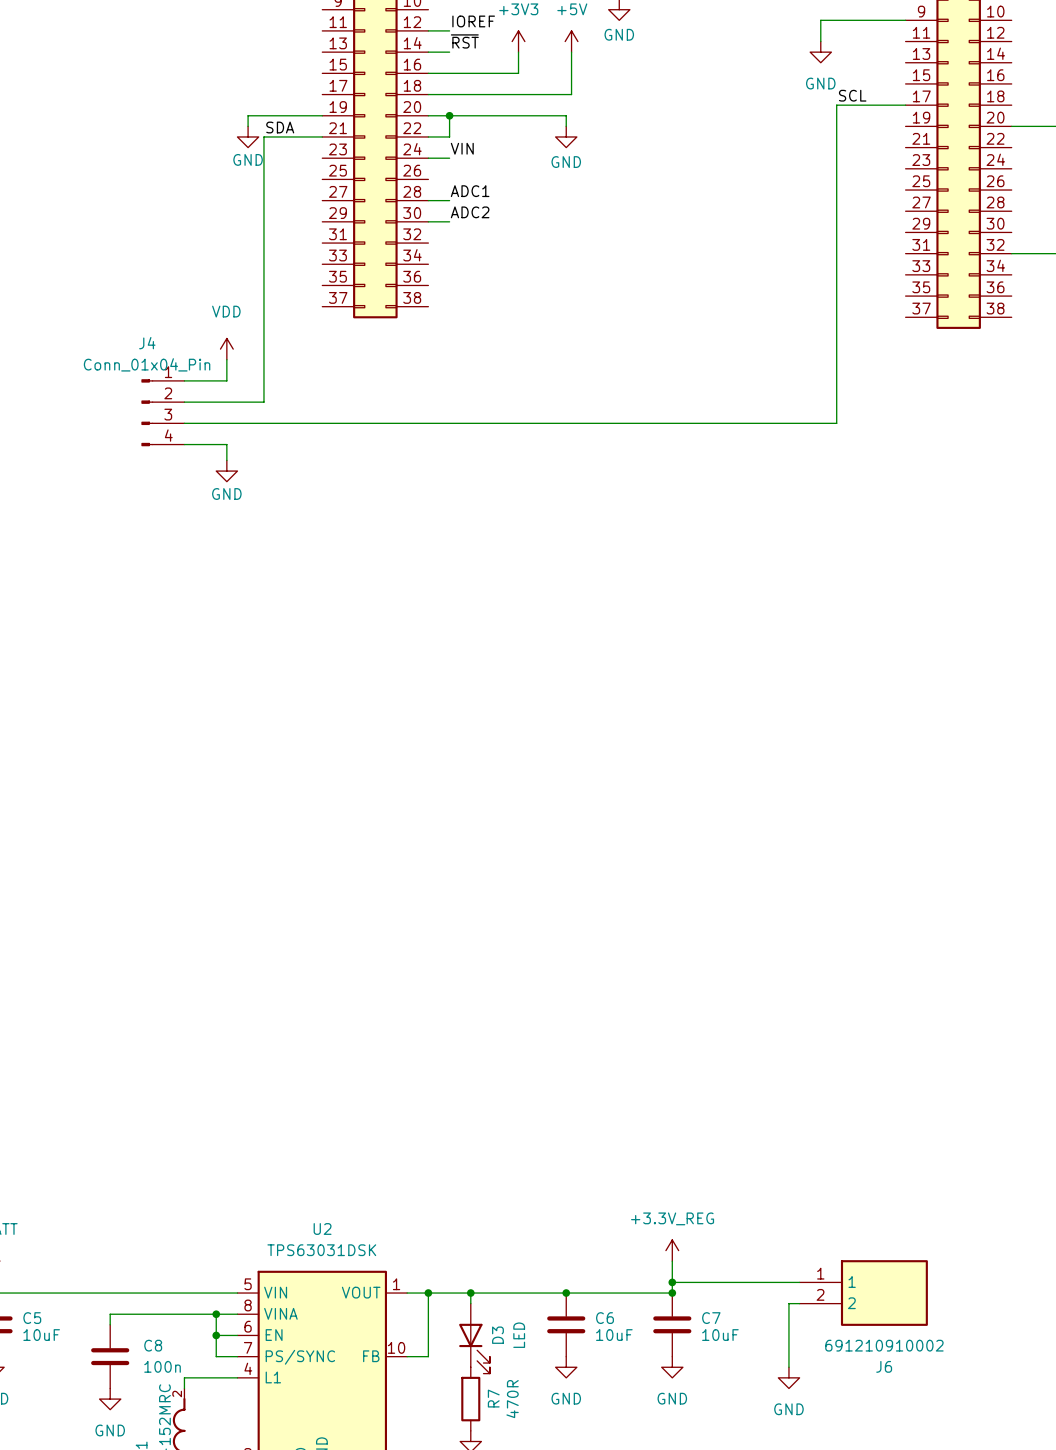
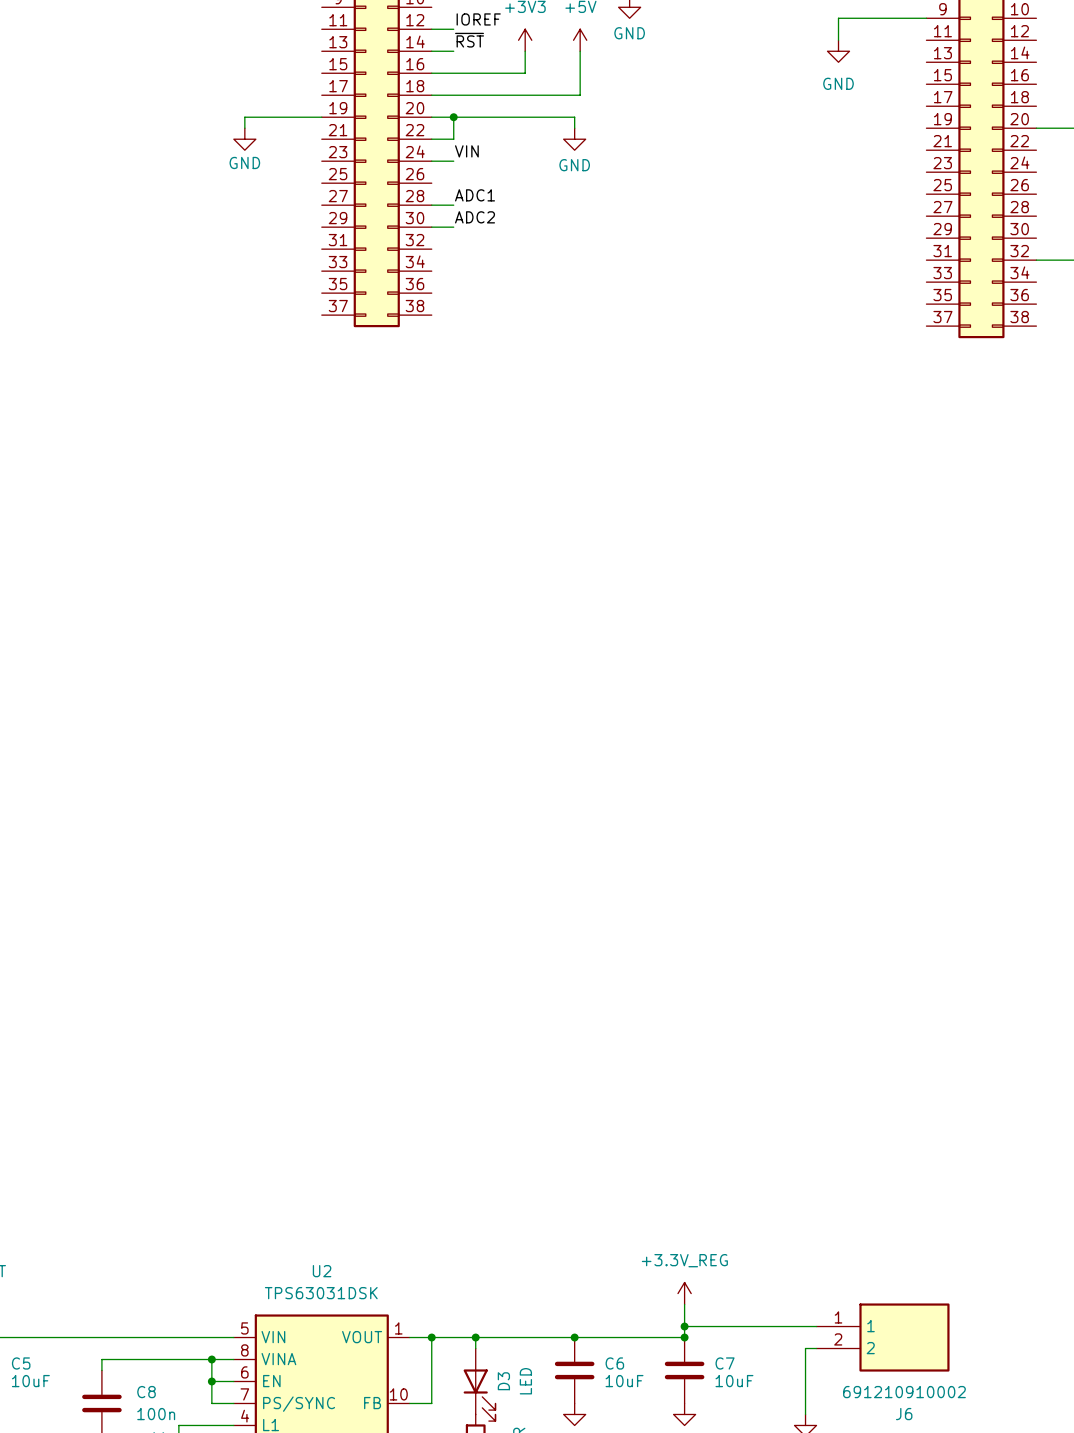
label: SCL (852, 95) -> none
wire: (905, 105) (836, 105) (836, 423) (184, 423) -> none
label: SDA (280, 127) -> none
wire: (322, 136) (263, 136) (263, 402) (184, 402) -> none
power symbol: VDD (226, 349) -> none
wire: (226, 359) (226, 380) (184, 380) -> none
J4: Conn_01x04_Pin (162, 412) -> none
wire: (184, 444) (226, 444) (226, 460) -> none
power symbol: GND (226, 471) -> none

